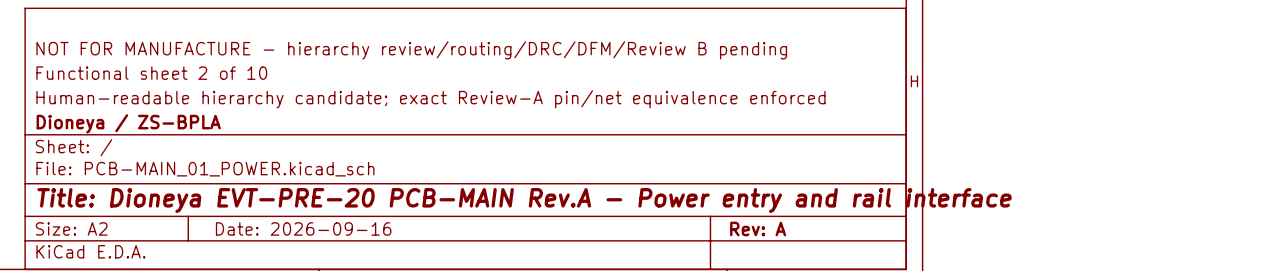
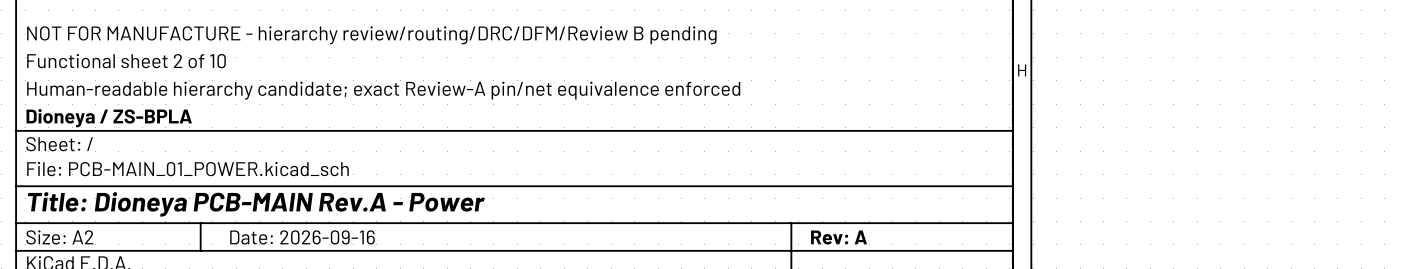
title block: Title: Dioneya EVT-PRE-20 PCB-MAIN Rev.A - Power entry and rail interface (524, 200) -> Title: Dioneya PCB-MAIN Rev.A - Power (256, 204)

